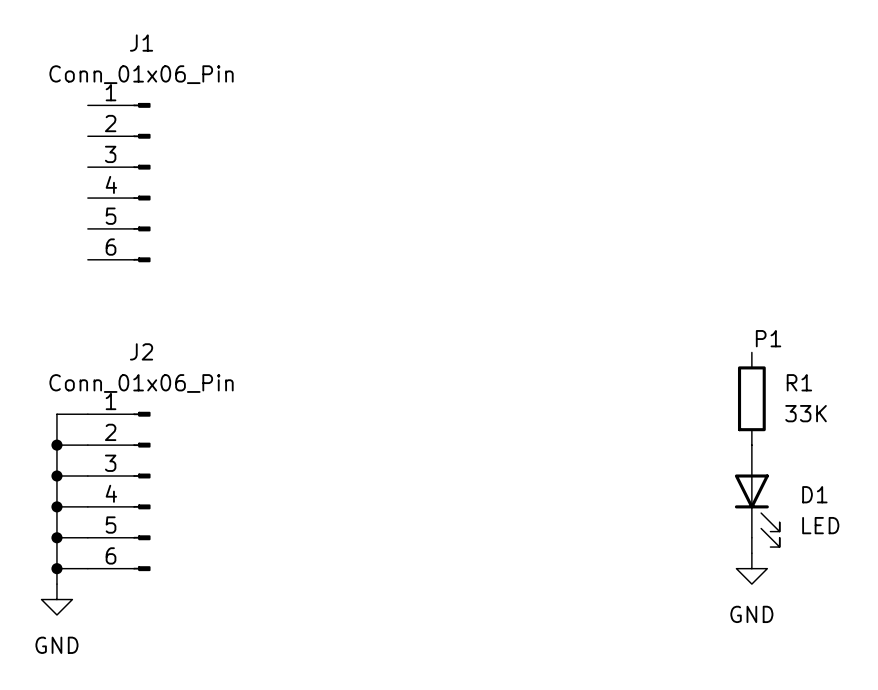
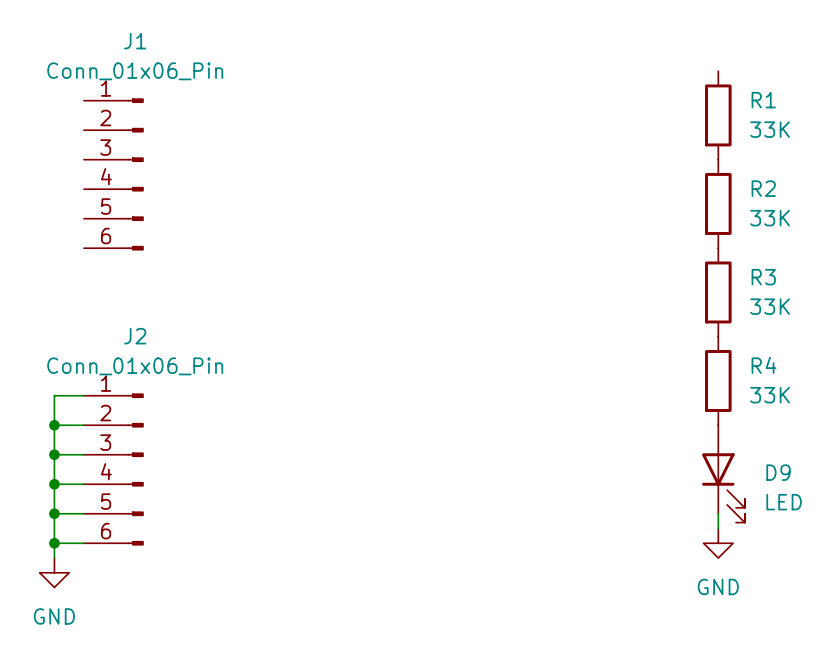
R1: none -> 33K (718, 115)
R2: none -> 33K (718, 203)
R3: none -> 33K (718, 292)
label: P1 (768, 338) -> none
R1 name: R1 (799, 382) -> R4 (764, 365)
D1 name: D1 (814, 494) -> D9 (778, 472)

